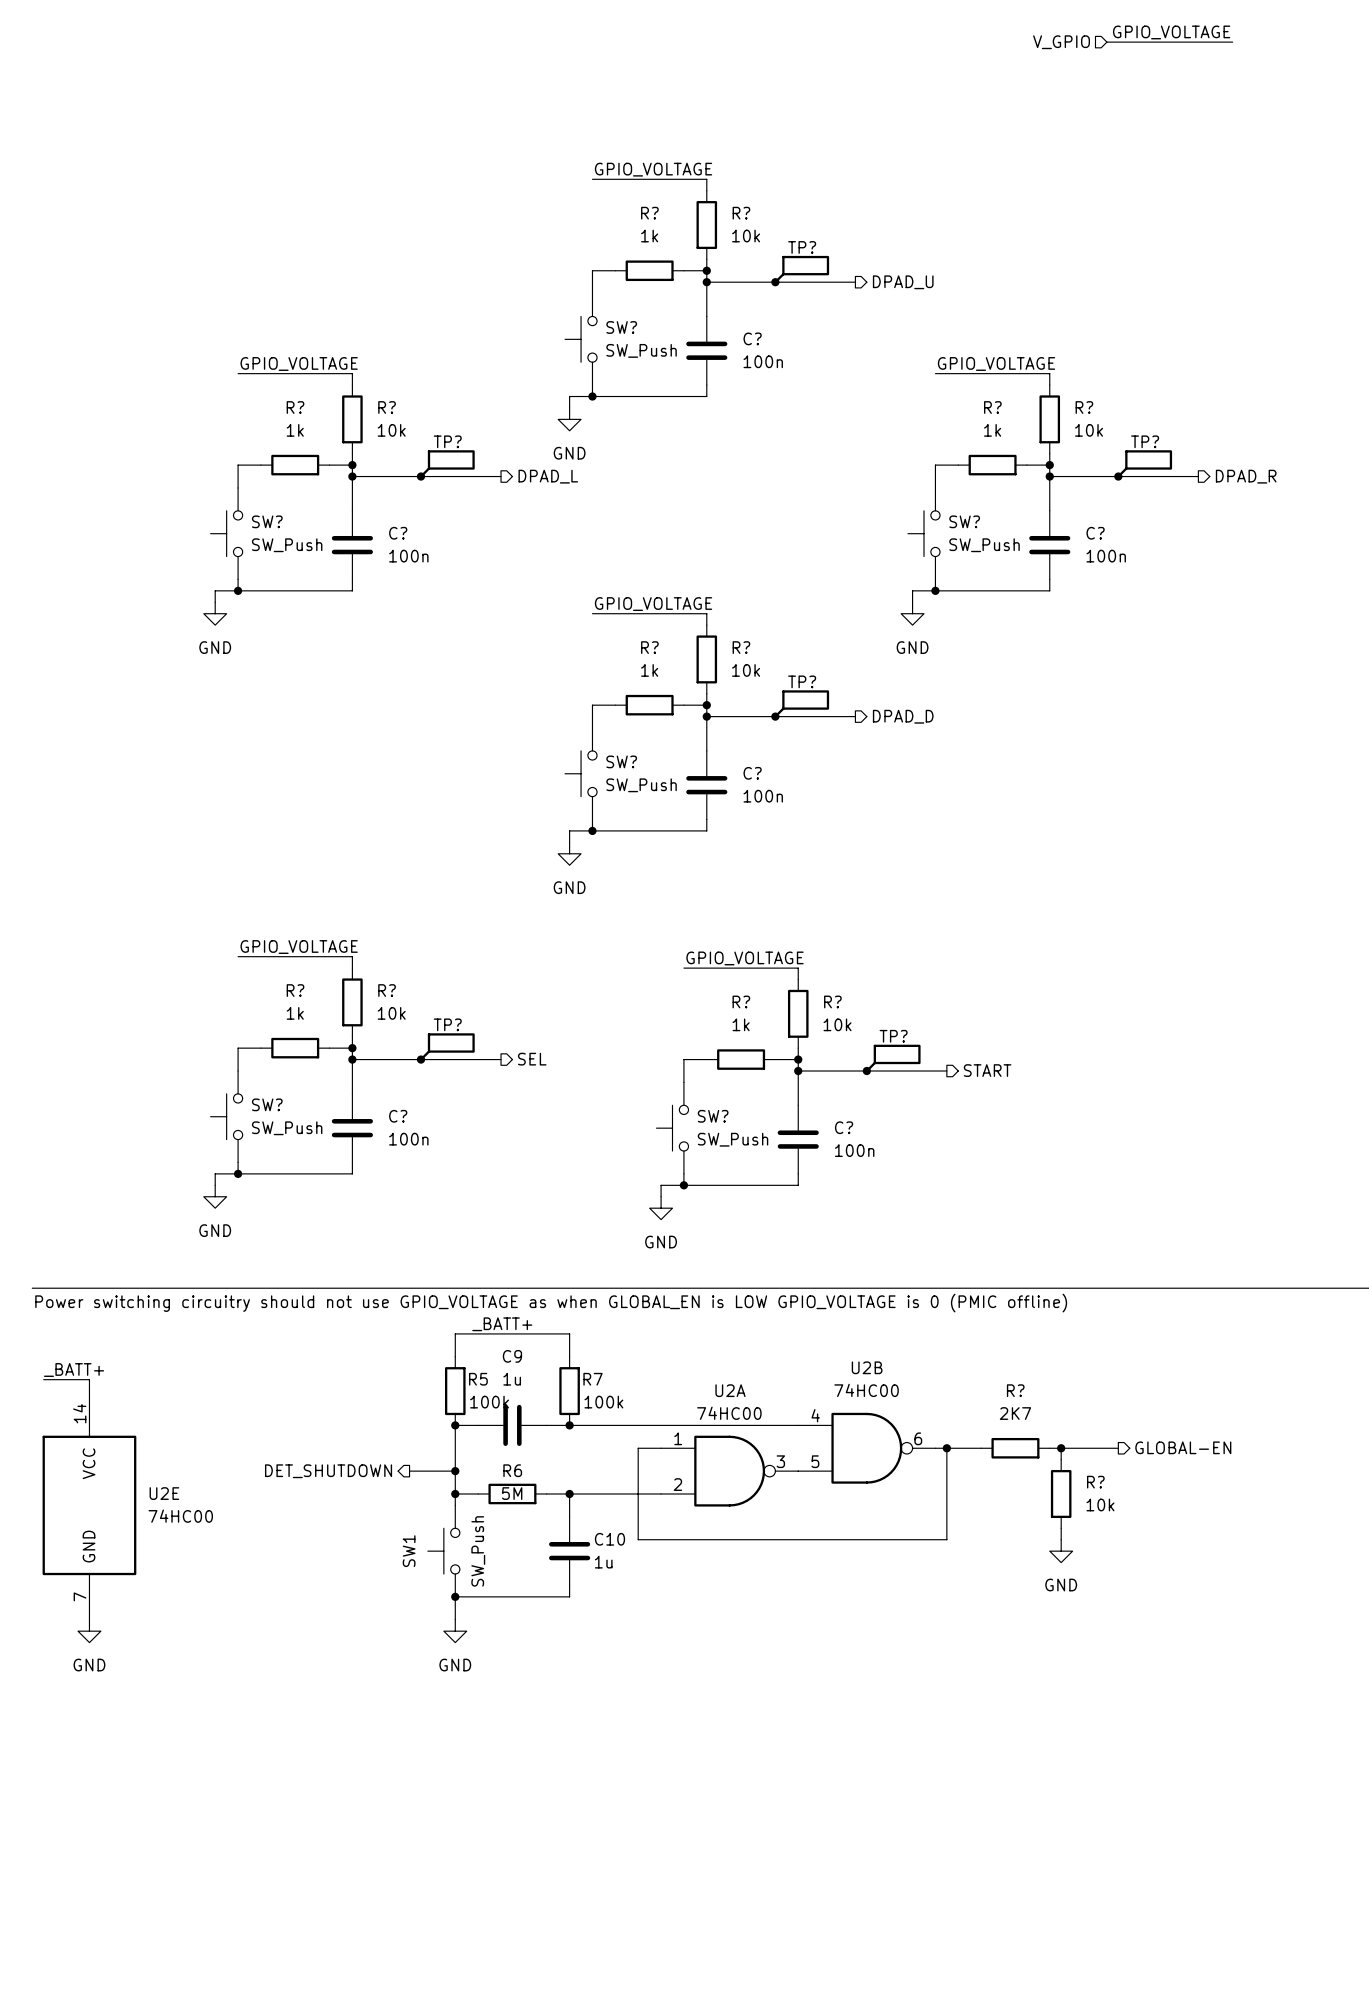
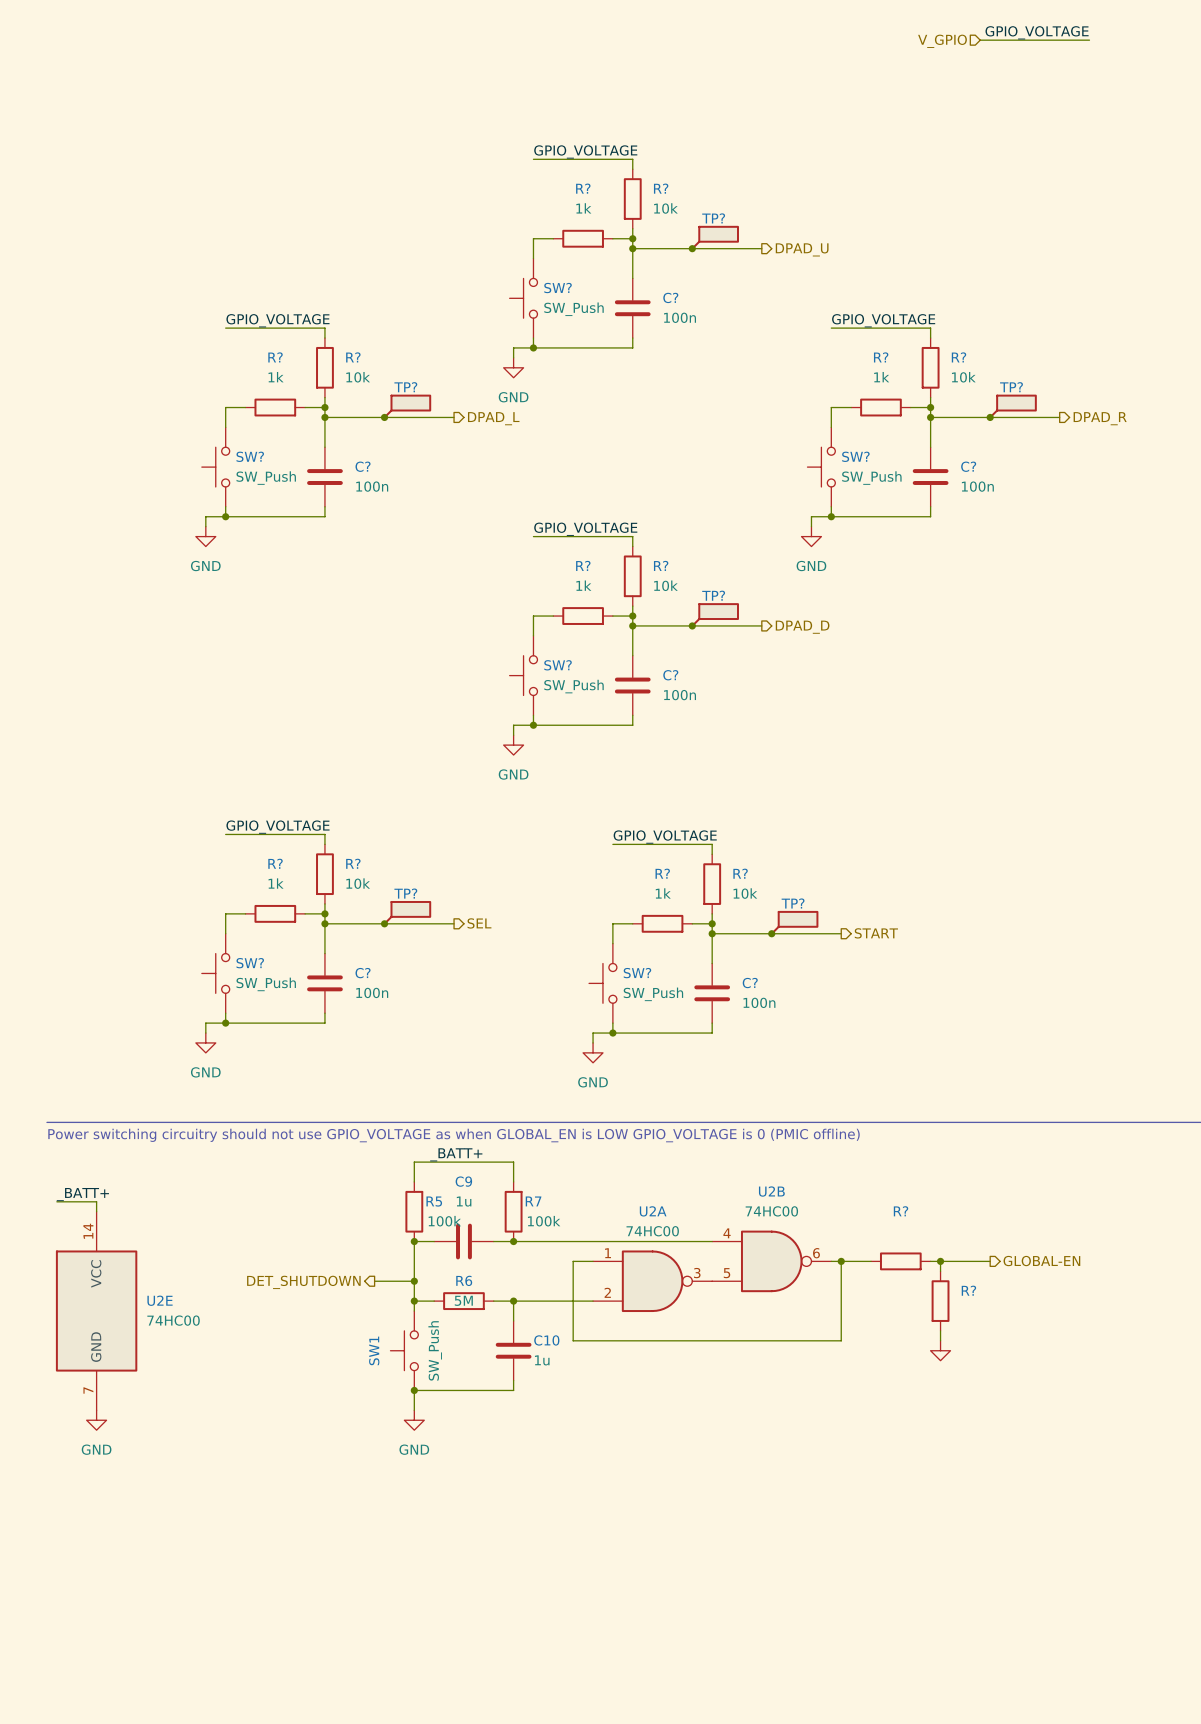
R? value: 2K7 (1015, 1413) -> none
R? value: 10k (1100, 1504) -> none
power symbol text: GND (1061, 1585) -> none

